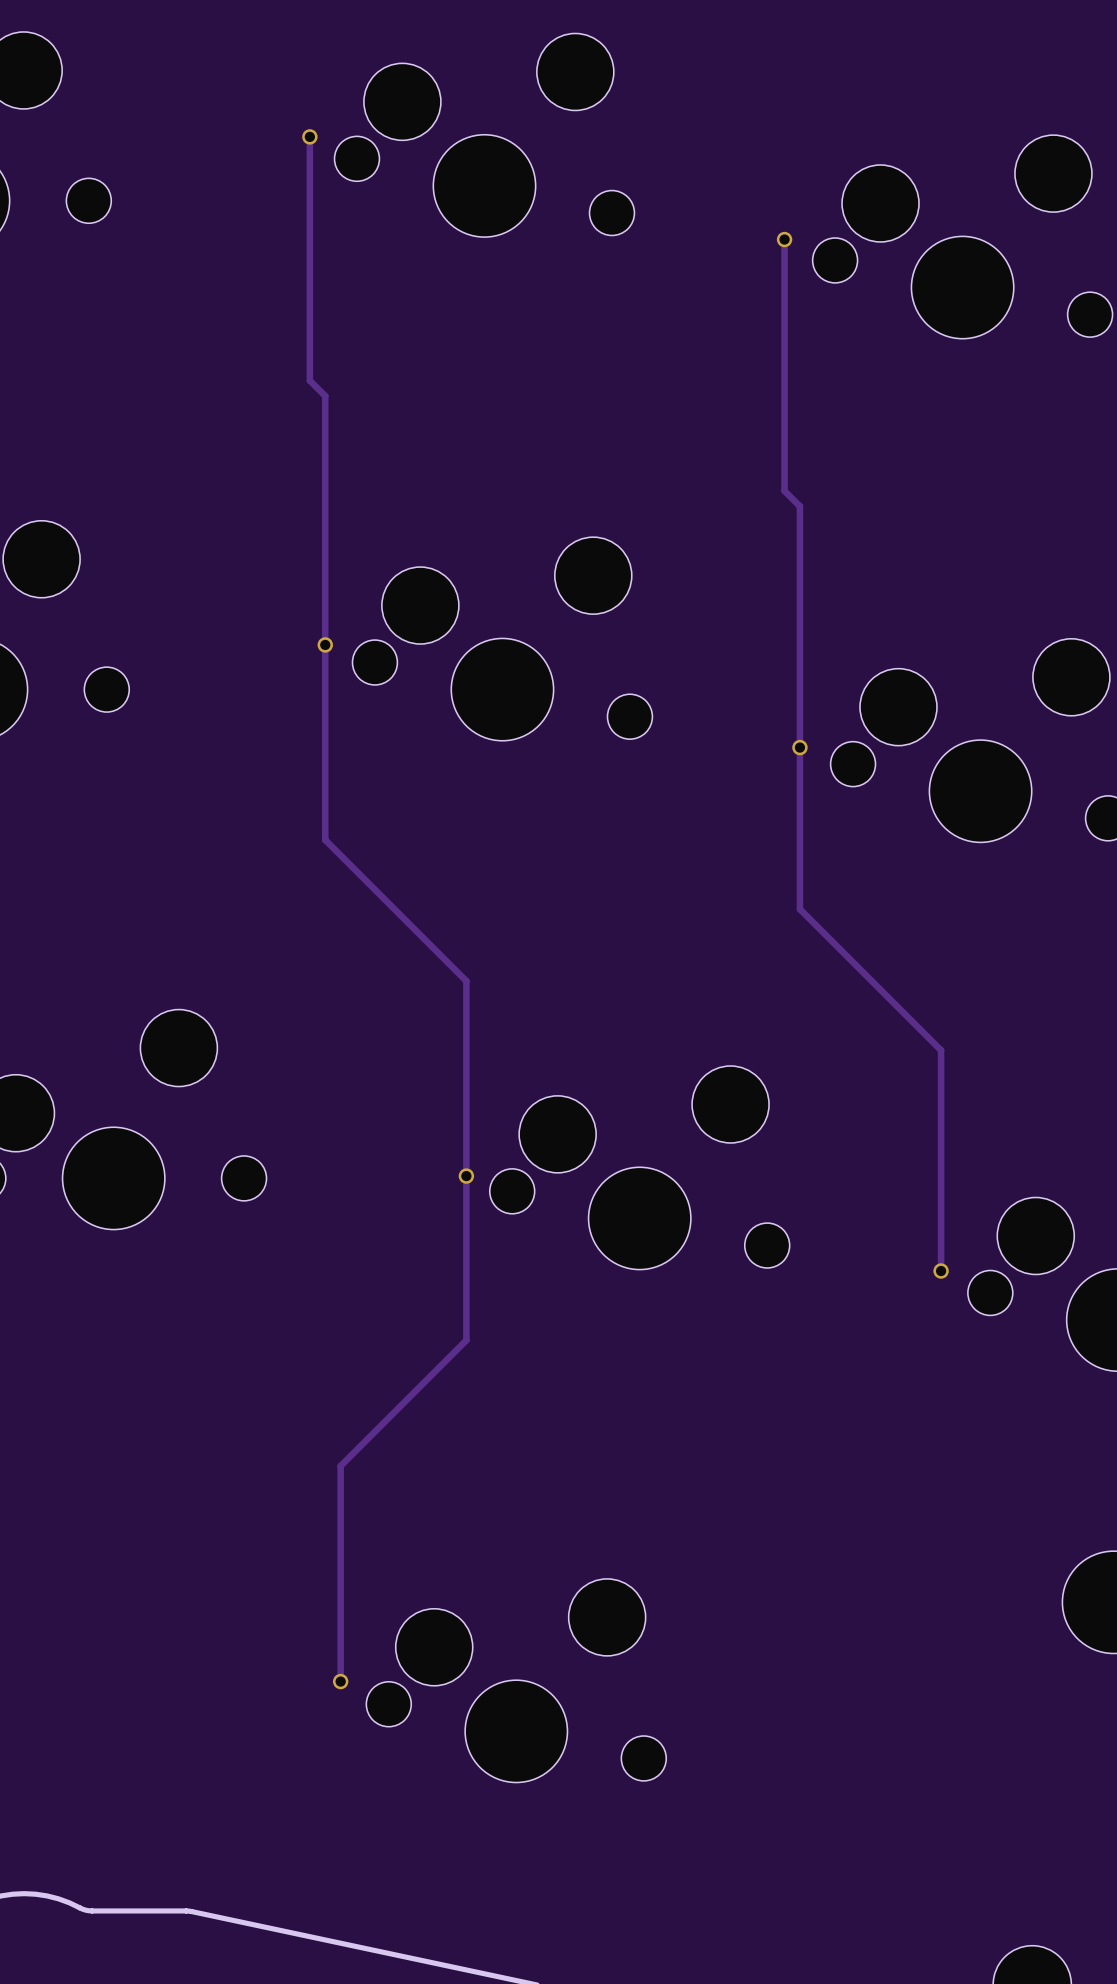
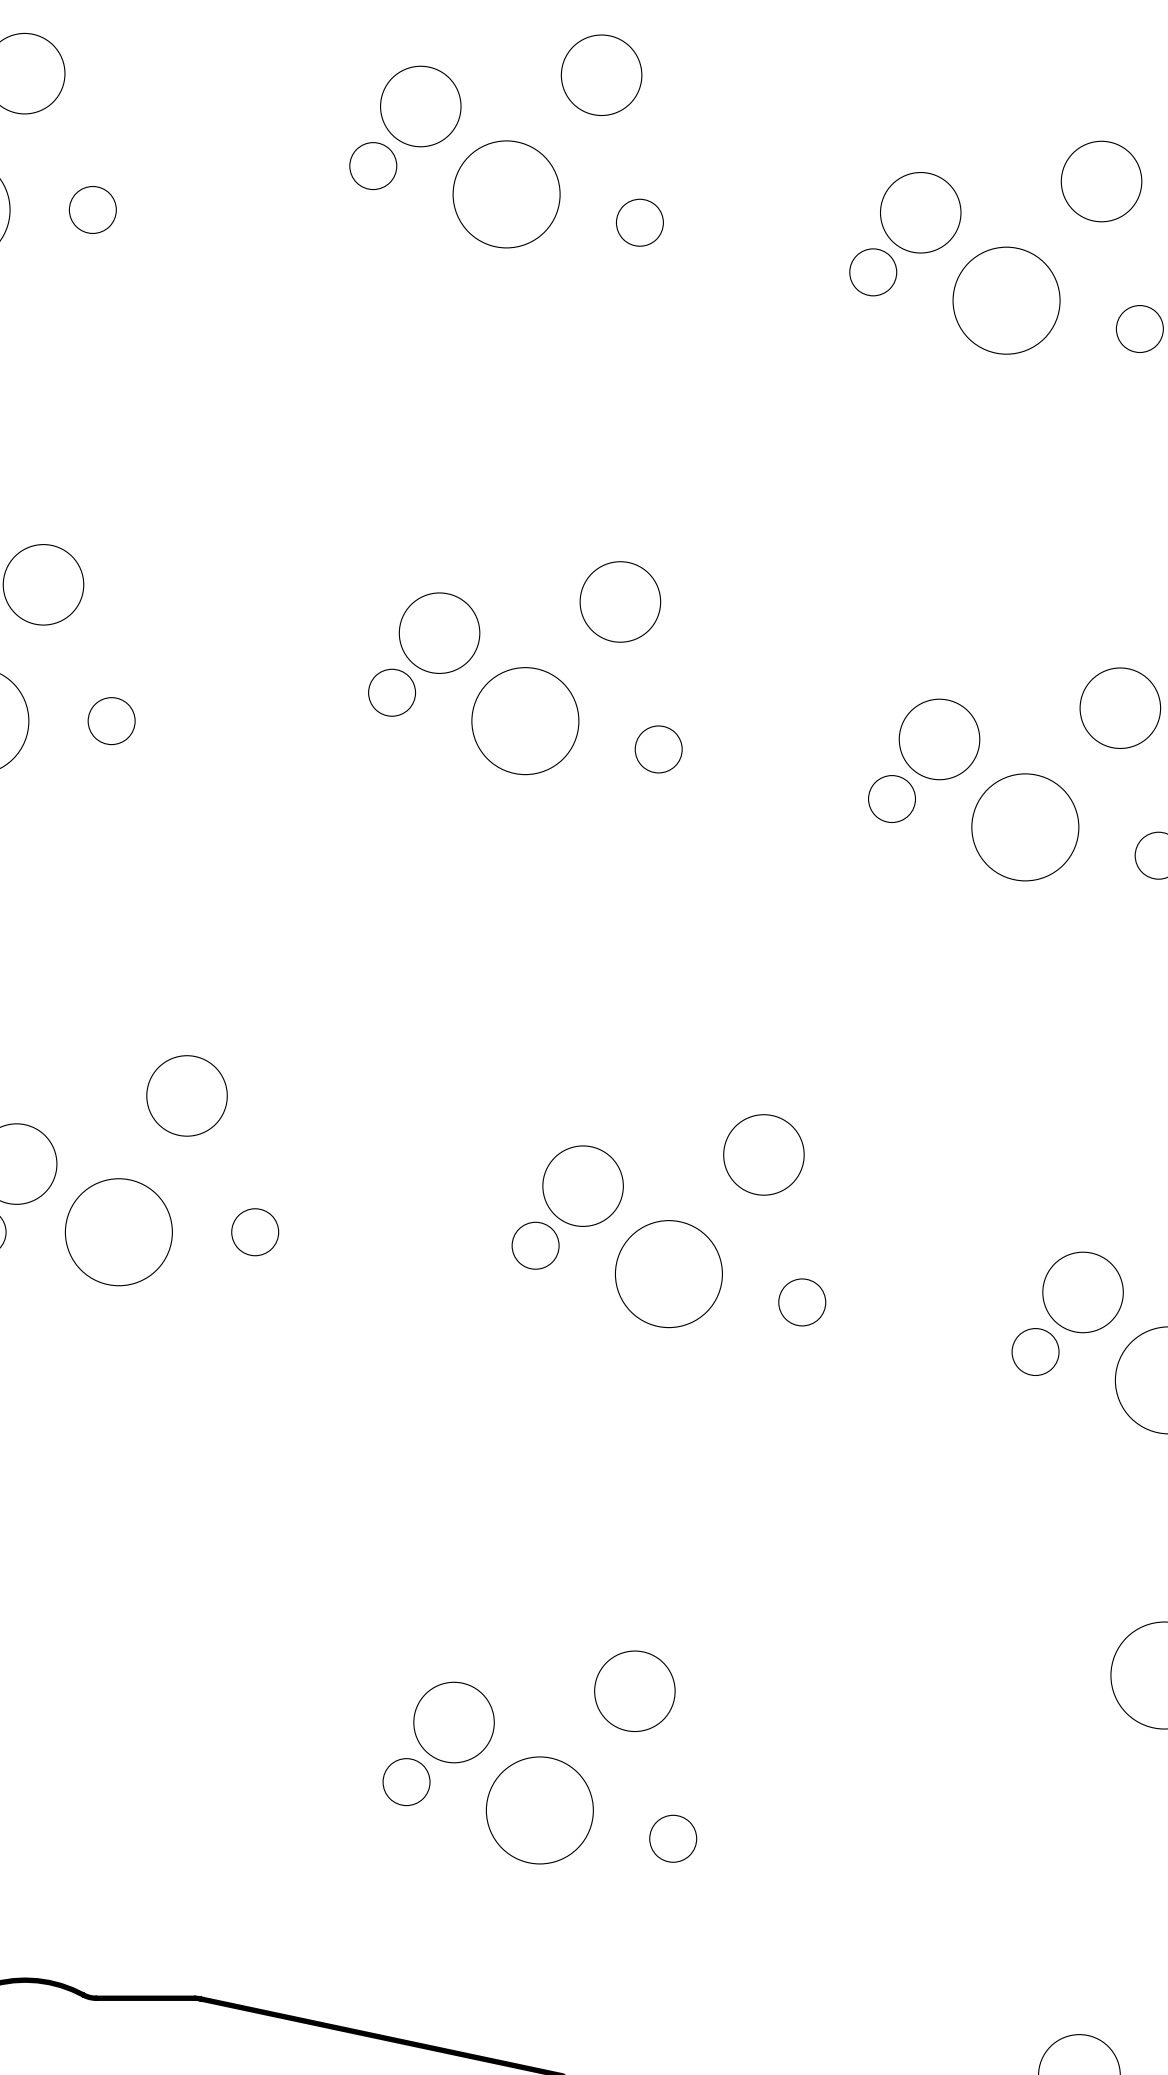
track: (309, 136) (309, 380) (325, 396) (325, 839) (466, 981) (466, 1340) (340, 1466) (340, 1681) -> none
via: (309, 136) -> none
track: (784, 239) (784, 490) (799, 506) (799, 909) (941, 1050) (941, 1271) -> none
via: (784, 239) -> none
via: (325, 644) -> none
via: (799, 747) -> none
via: (466, 1176) -> none
via: (941, 1271) -> none
via: (340, 1681) -> none

